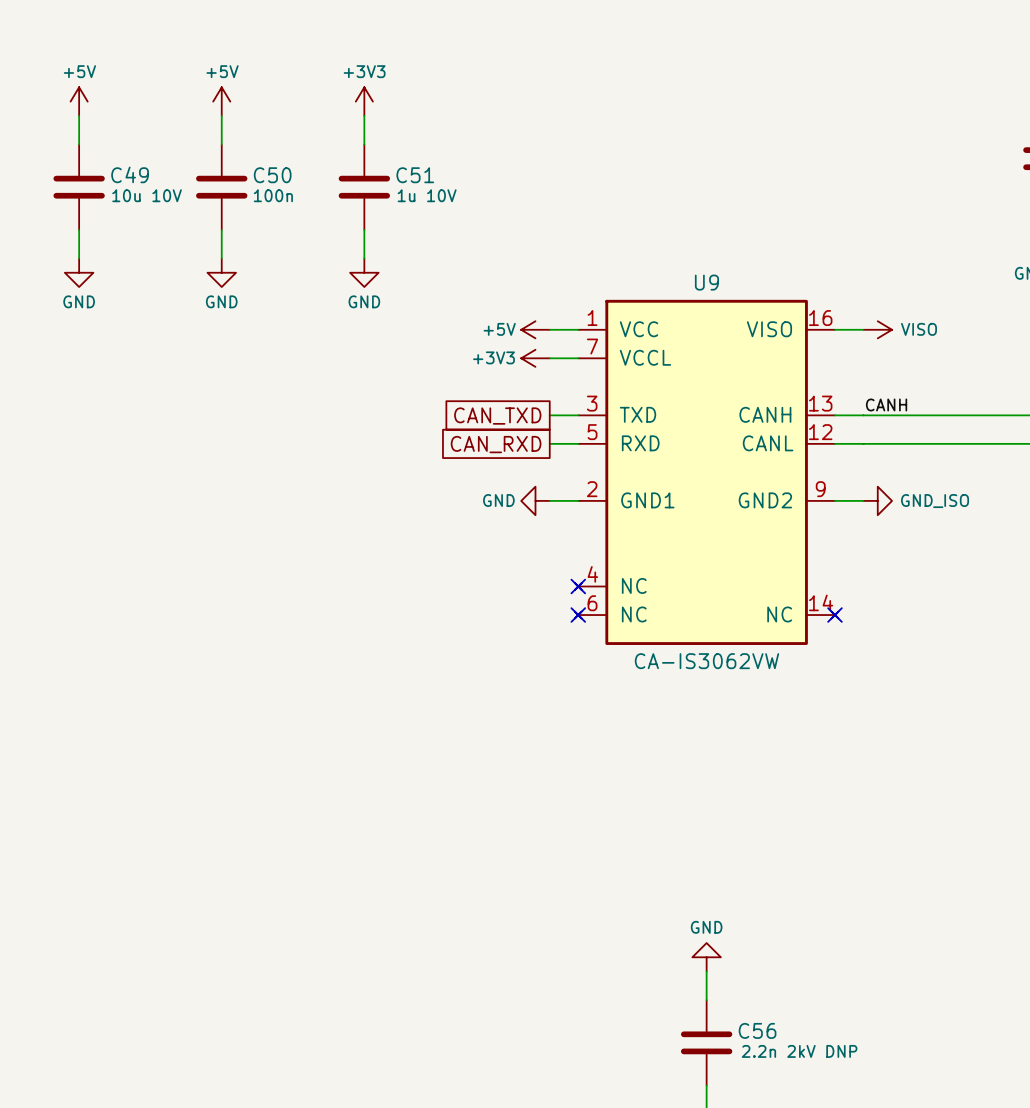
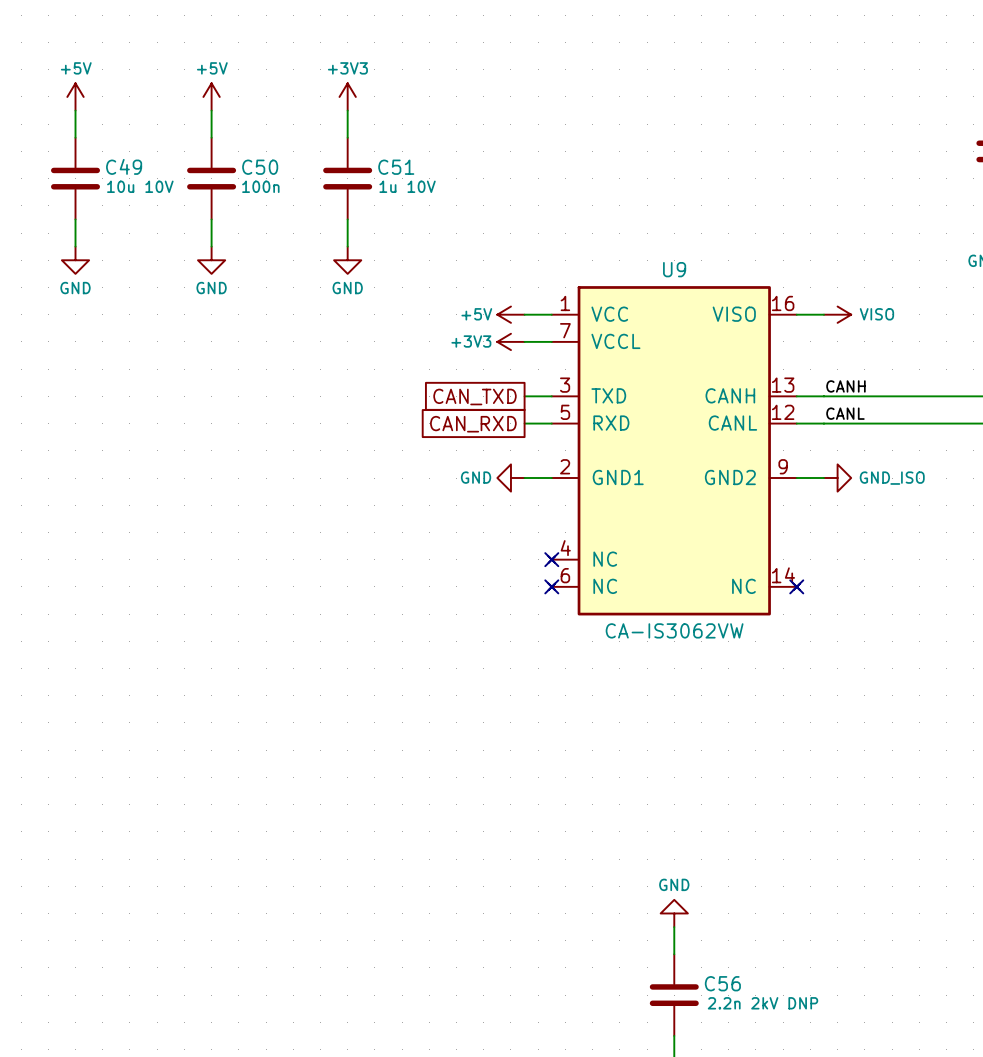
label: none -> CANL (845, 413)

